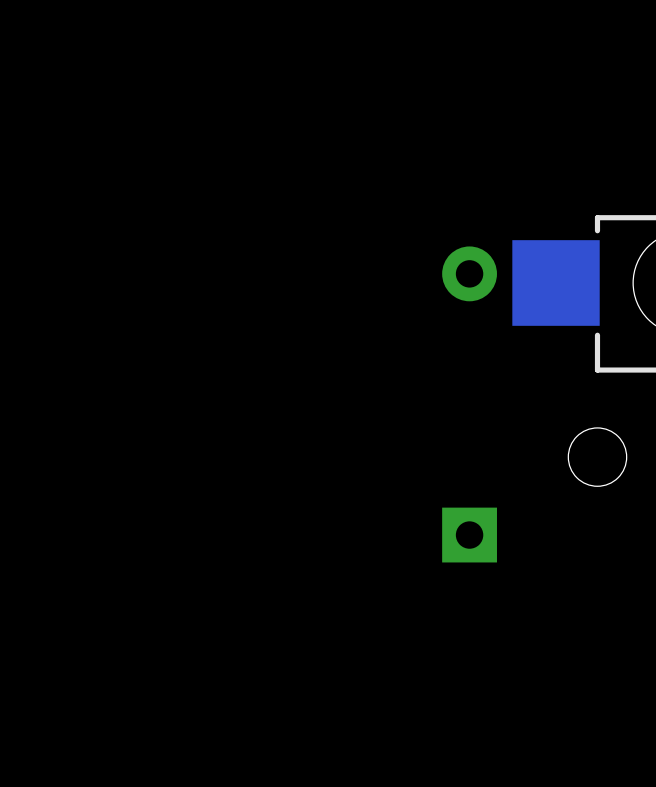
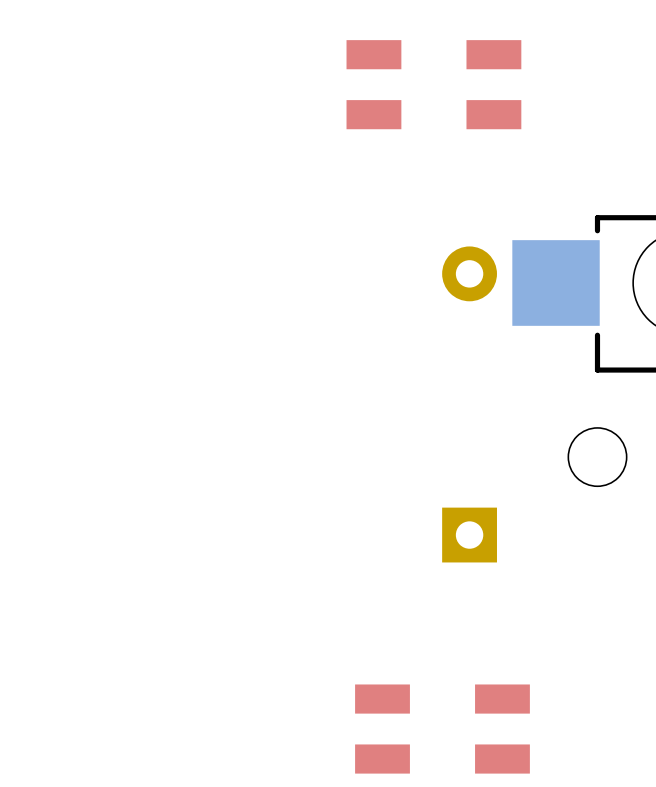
part: none -> (433, 84)
part: none -> (442, 729)

